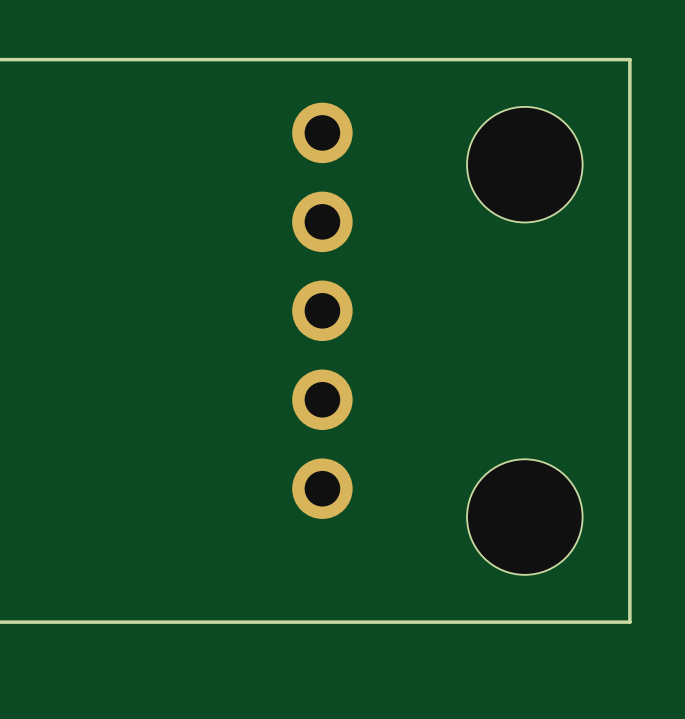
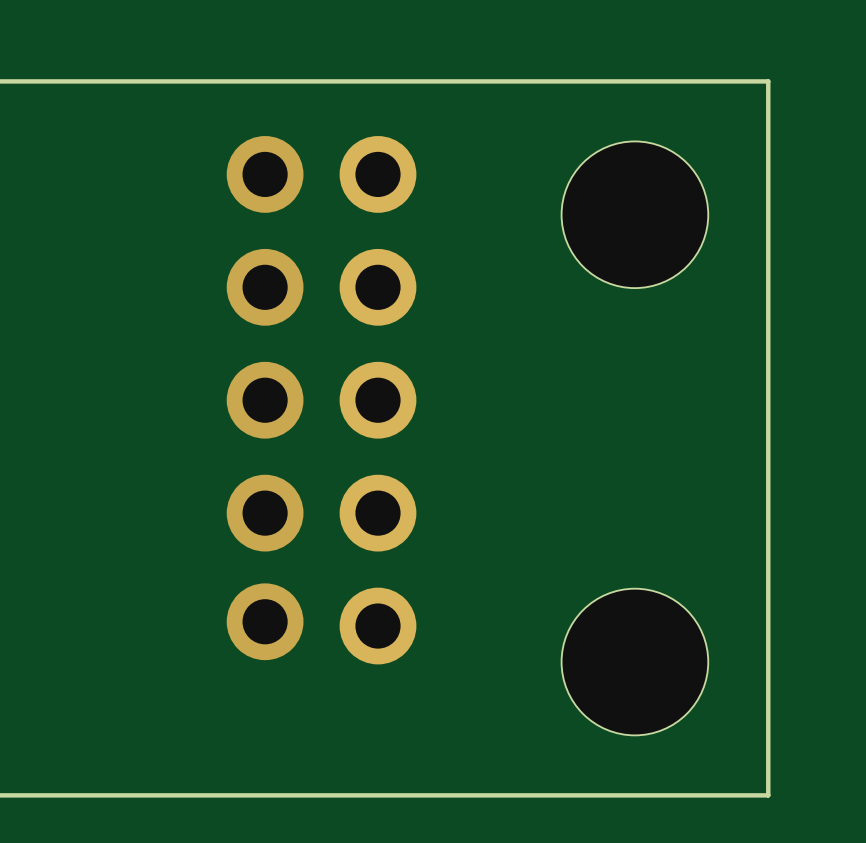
via: none -> (265, 174)
via: none -> (265, 287)
via: none -> (265, 400)
via: none -> (265, 513)
via: none -> (265, 621)

